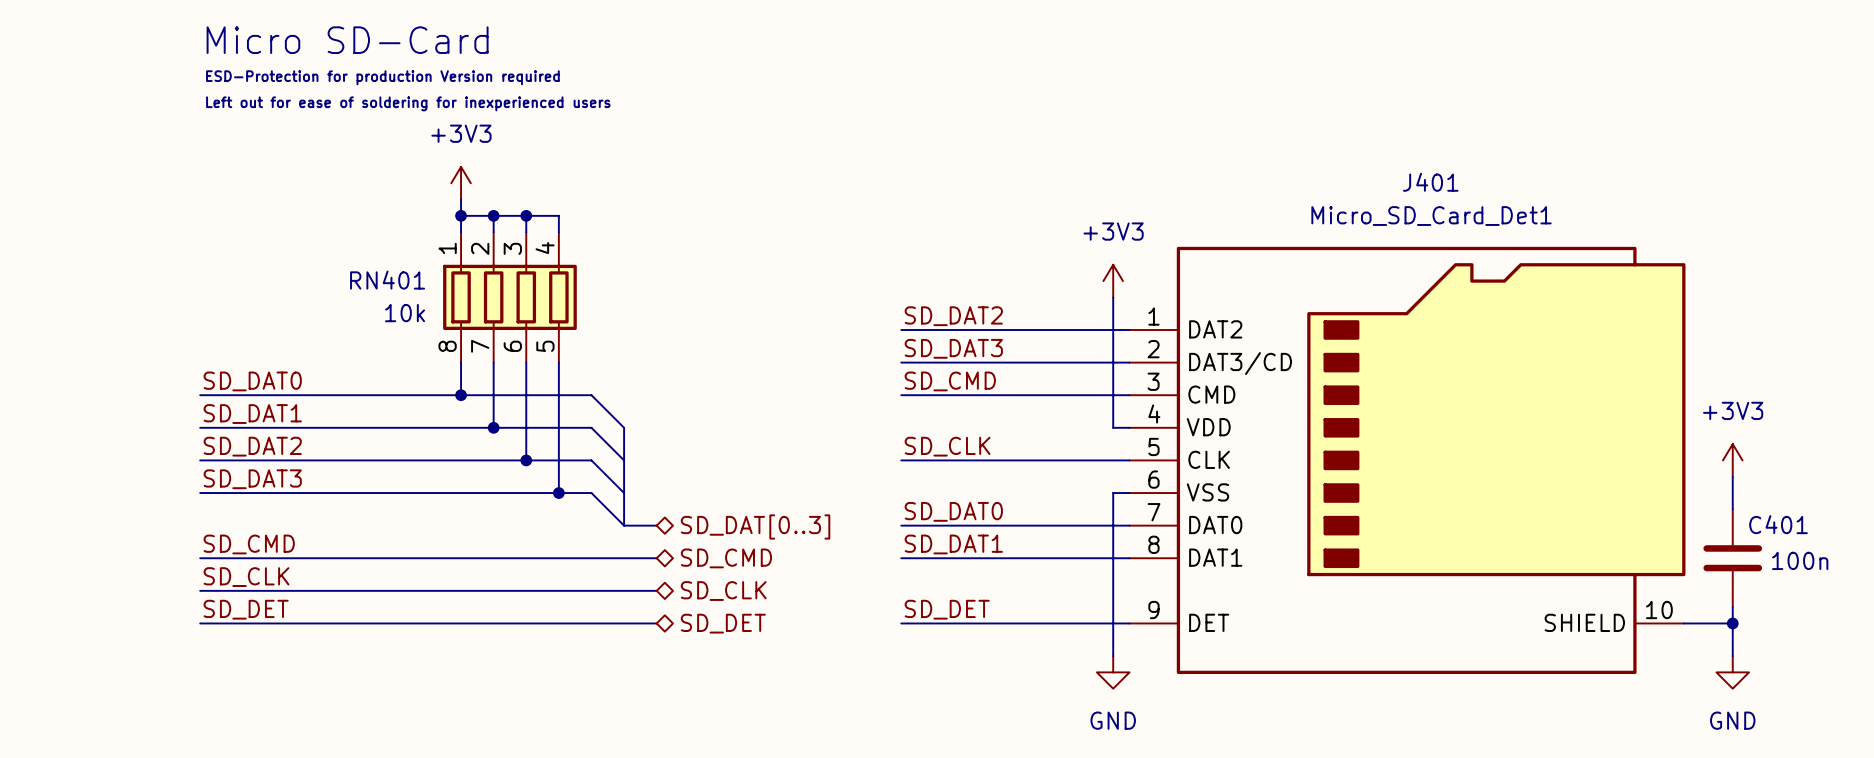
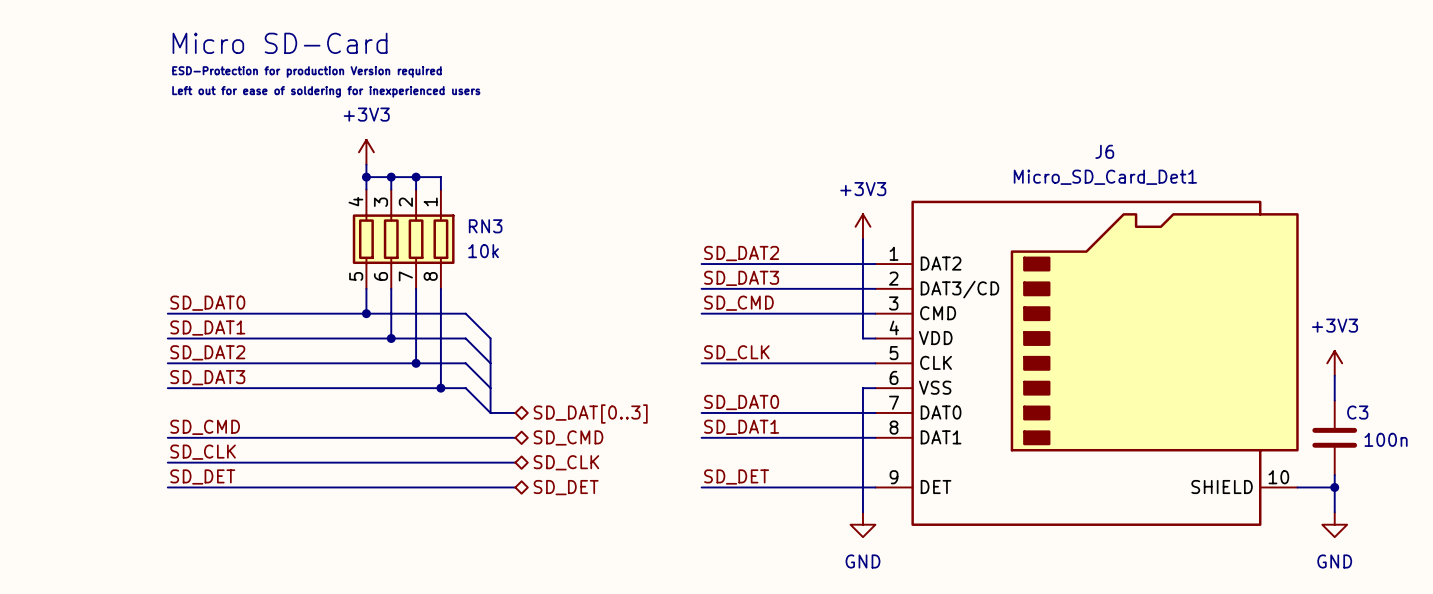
J401 name: J401 (1430, 182) -> J6 (1104, 151)
RN401 name: RN401 (387, 280) -> RN3 (485, 226)
RN401 flip: as is (509, 297) -> left-right (403, 239)
C401 name: C401 (1778, 524) -> C3 (1357, 412)

